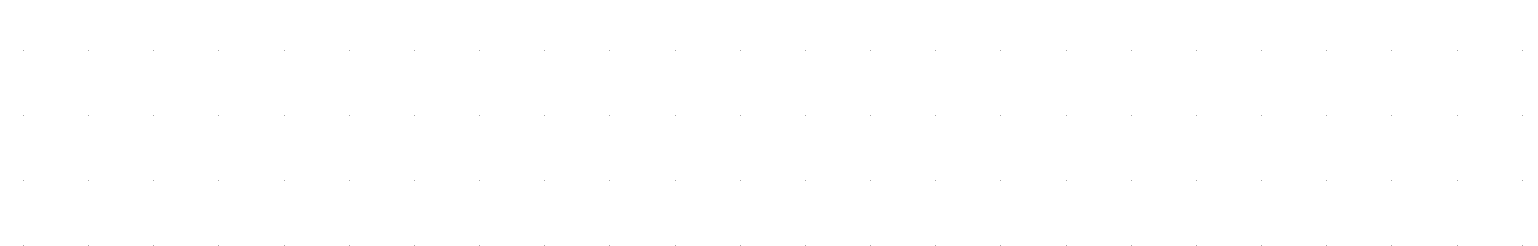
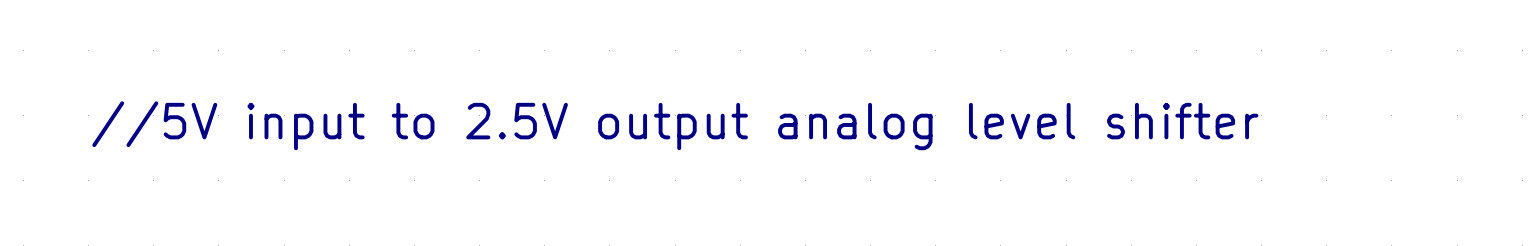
text: none -> //5V input to 2.5V output analog level shifter (675, 125)

